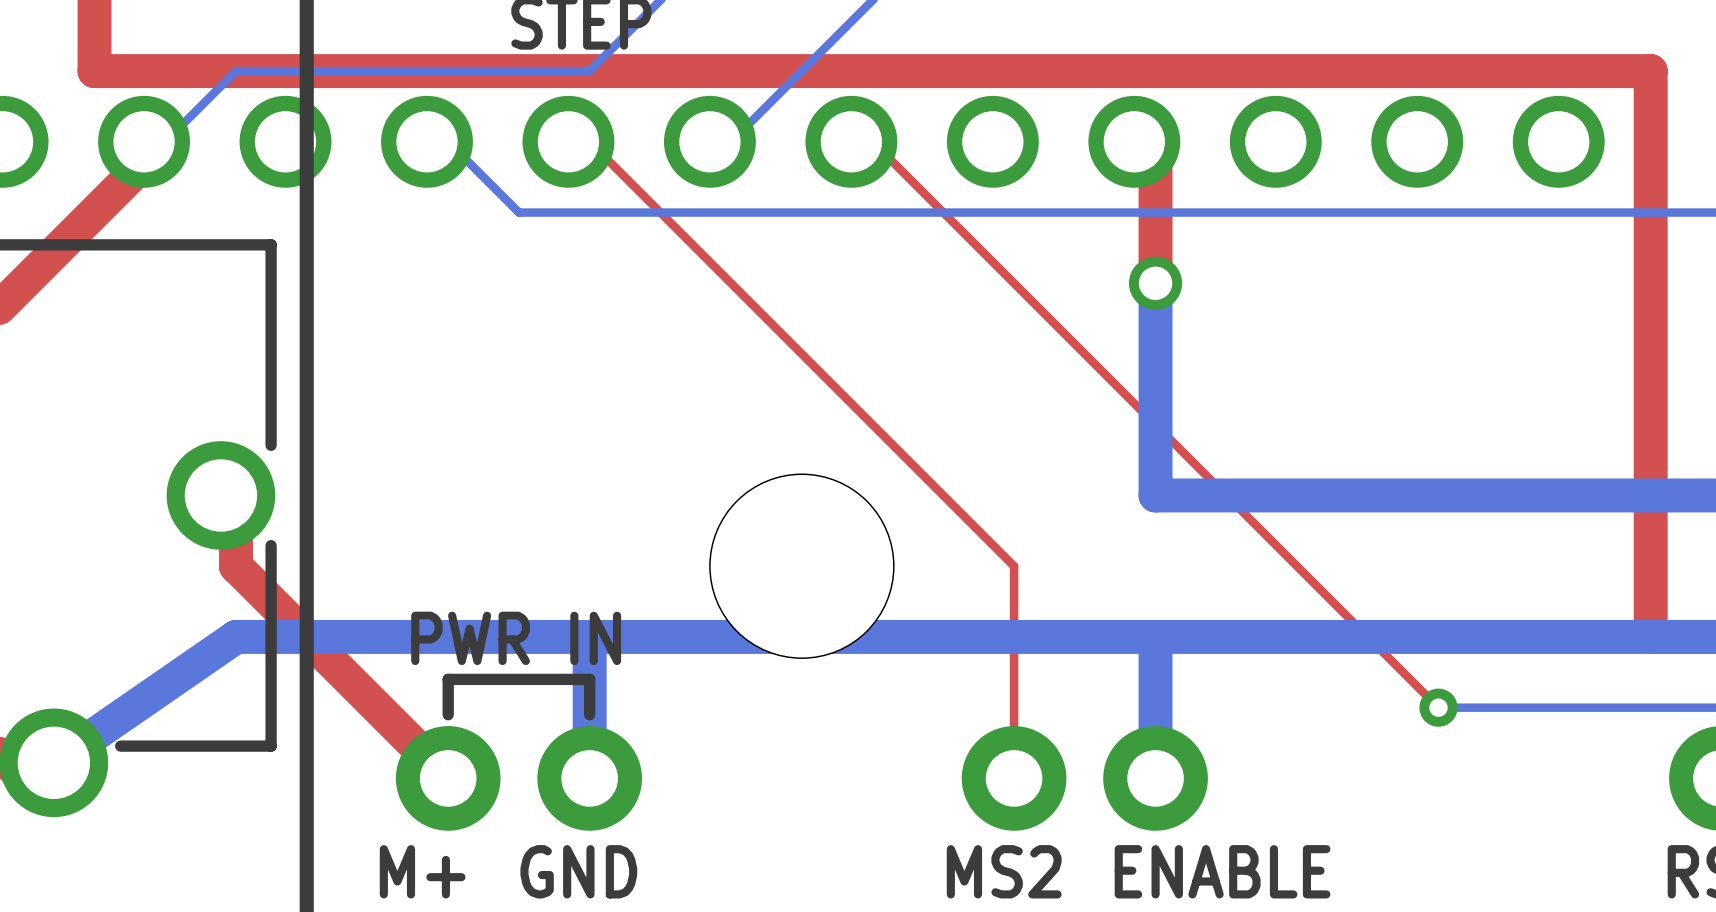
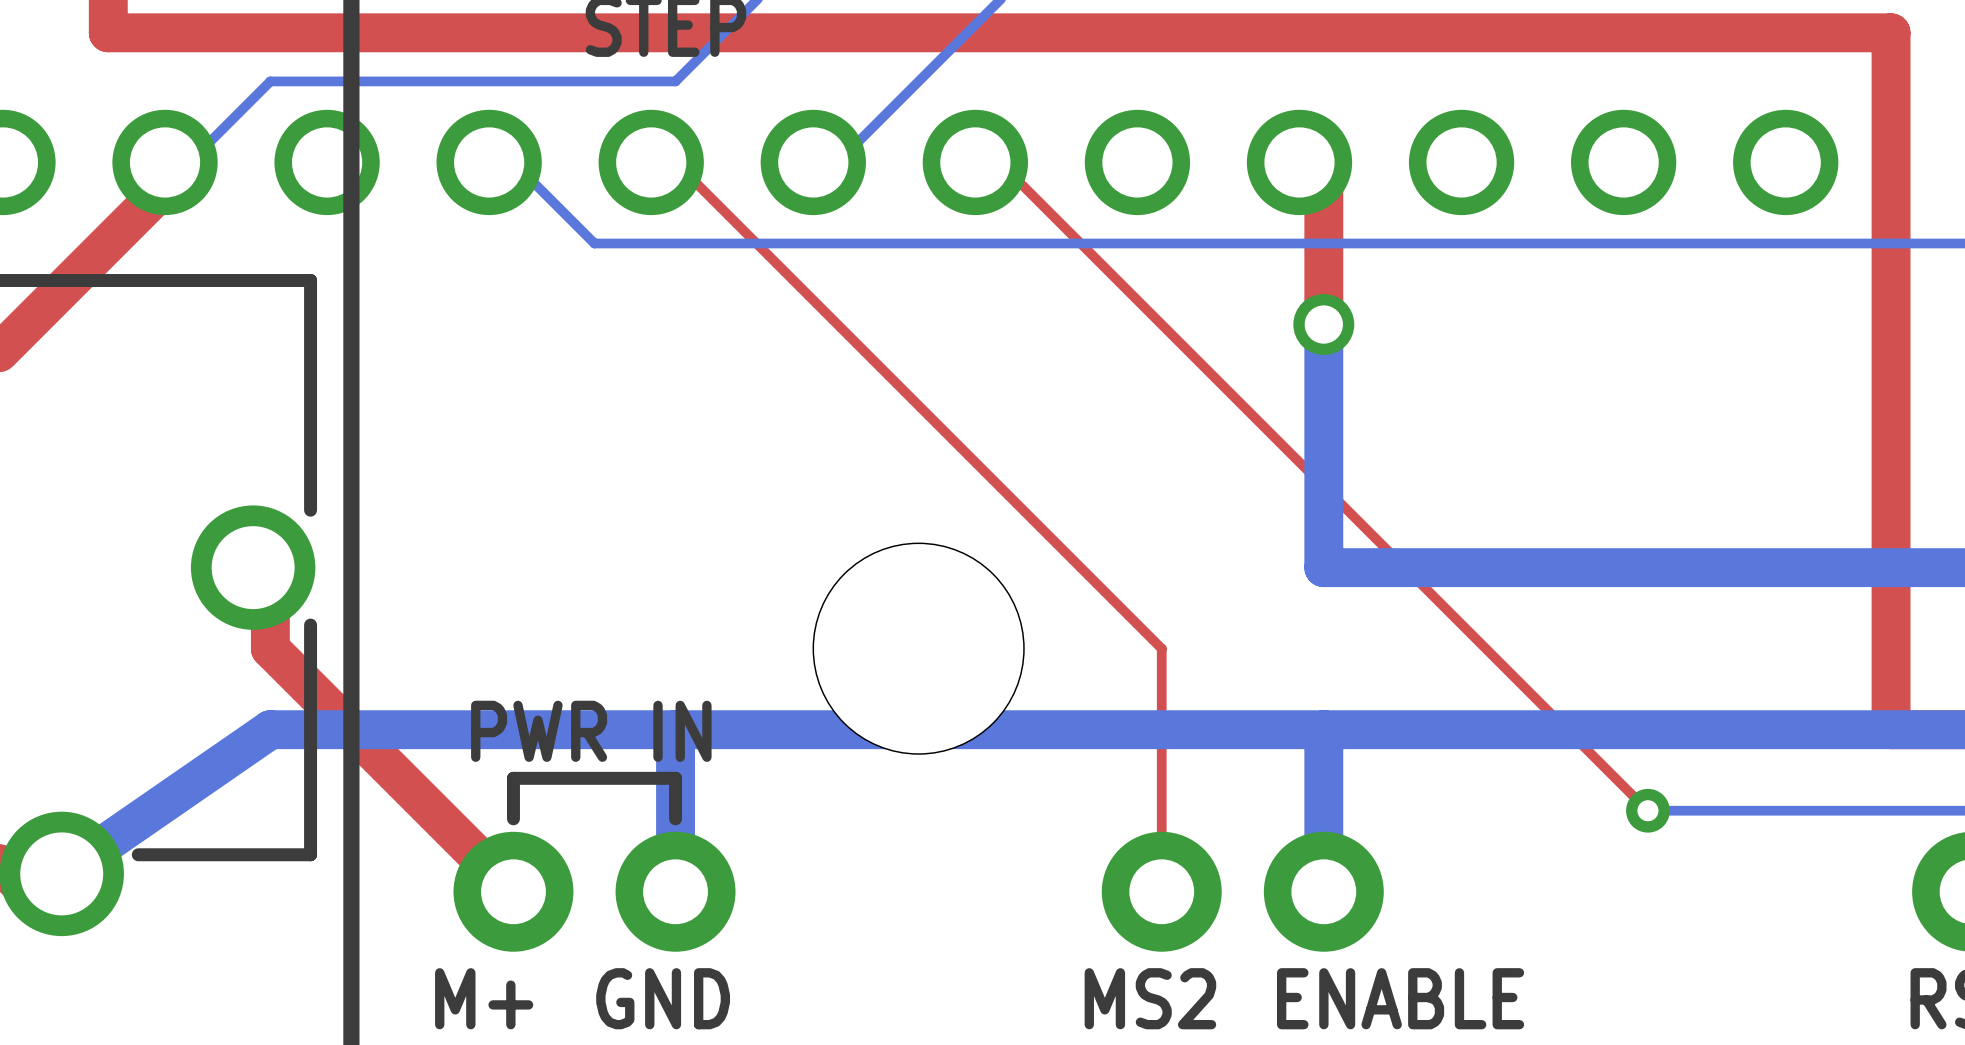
top track: (94, 28) (94, 71) (1650, 71) -> (108, 32) (1891, 32) (1891, 81)

